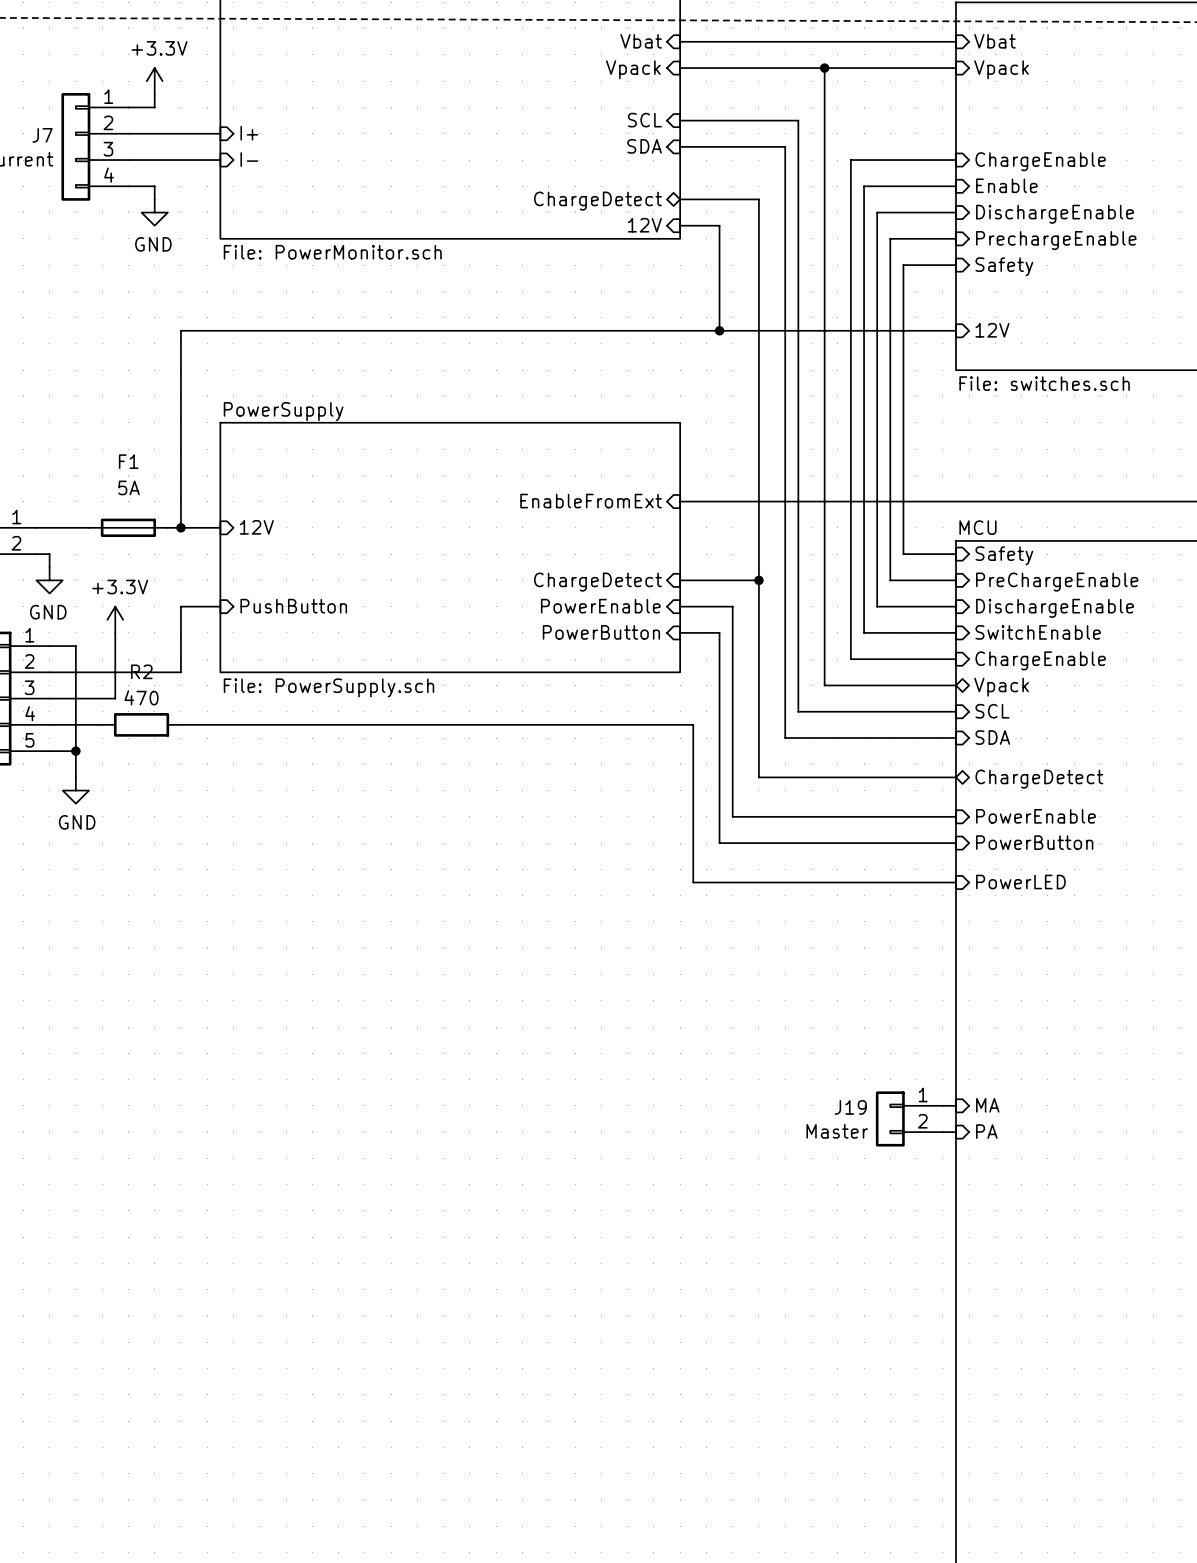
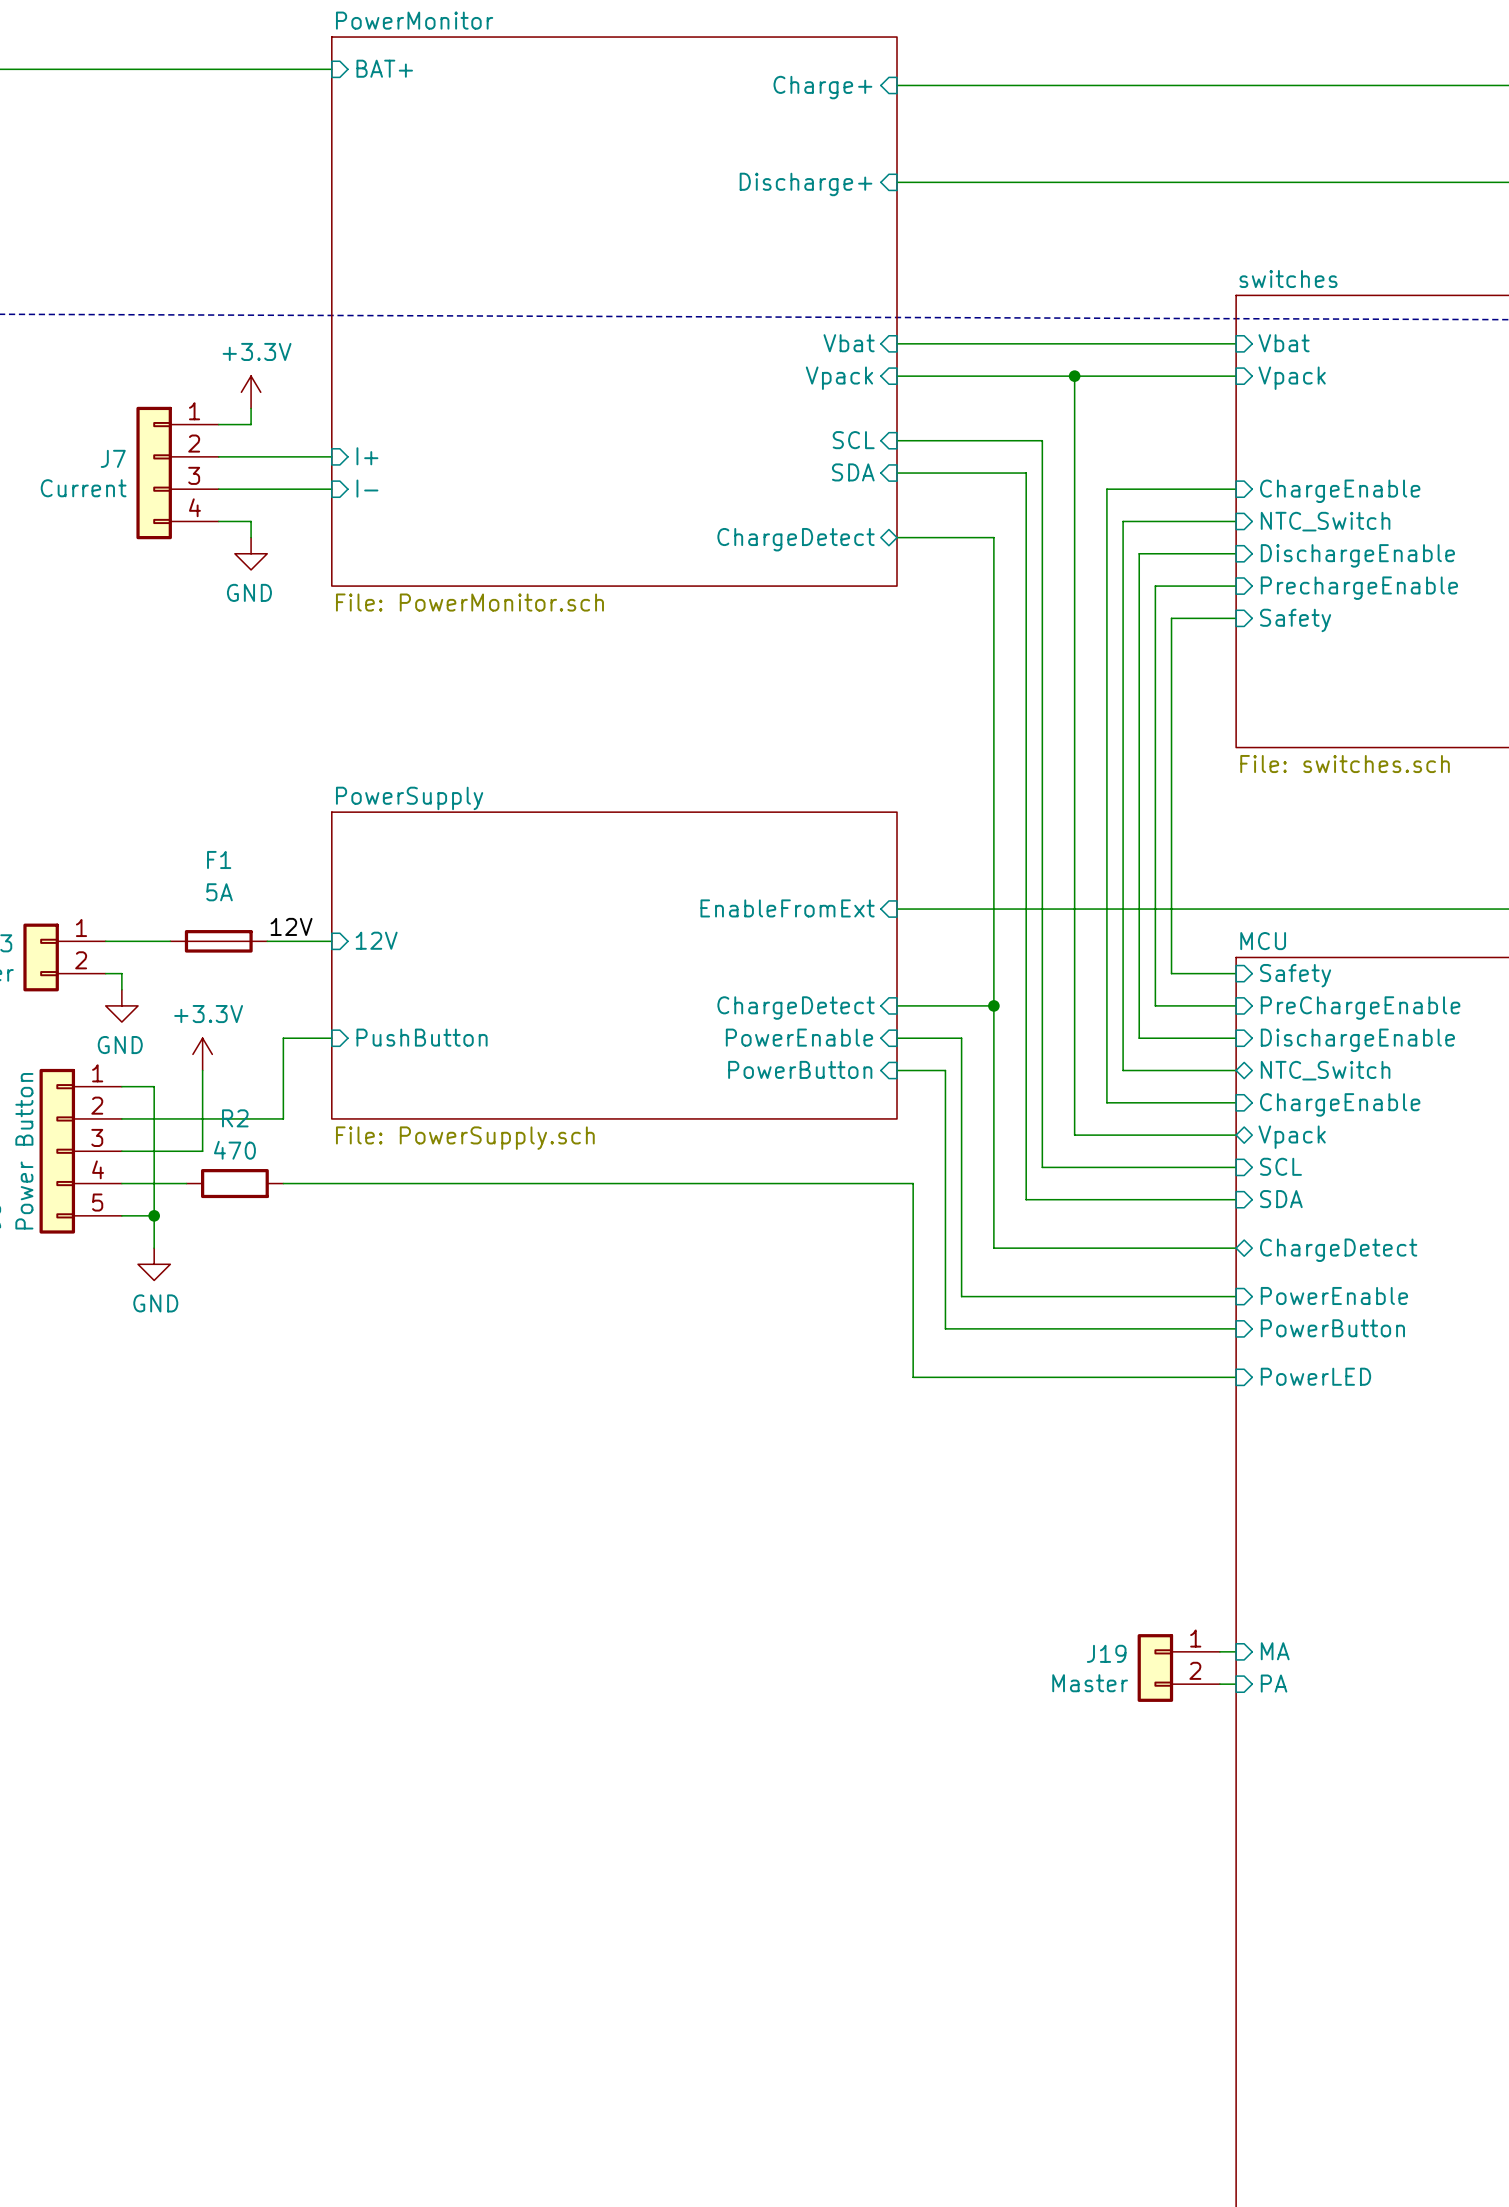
sheet pin: Enable (1006, 185) -> NTC_Switch (1325, 521)
sheet pin: 12V (644, 225) -> none
wire: (680, 225) (719, 225) (719, 330) -> none
junction: (719, 330) -> none
wire: (955, 330) (180, 330) (180, 527) -> none
sheet pin: 12V (992, 330) -> none
label: none -> 12V (291, 926)
junction: (180, 527) -> none
sheet pin shape: input (1038, 632) -> bidirectional (1325, 1070)
sheet pin: SwitchEnable (1038, 632) -> NTC_Switch (1325, 1070)

